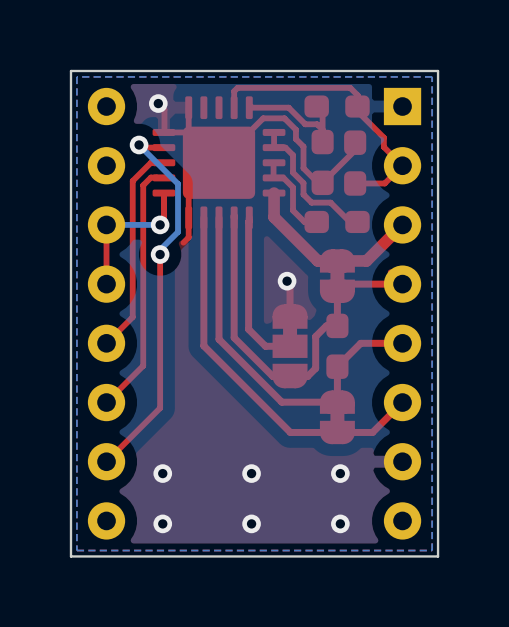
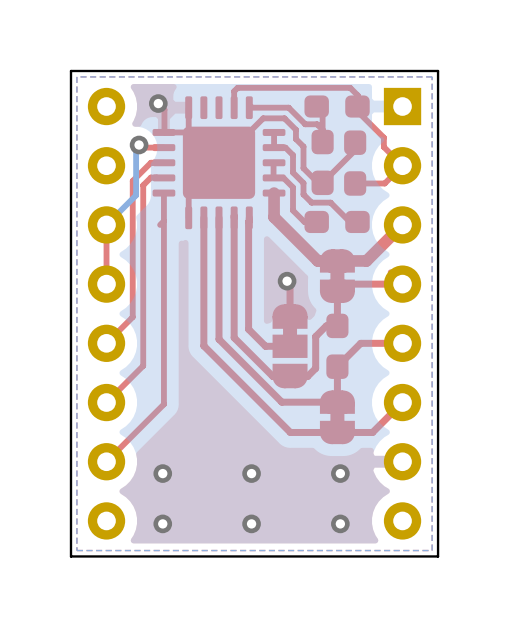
bottom track: (139, 145) (178, 183) (178, 232) (160, 249) (160, 254) -> none
top track: (188, 218) (188, 237) (183, 242) -> none
bottom track: (160, 224) (106, 224) -> (136, 147) (136, 195) (106, 224)
via: (160, 224) -> none
top track: (160, 254) (160, 408) -> (163, 221) (163, 404) (160, 408)
via: (160, 254) -> none

